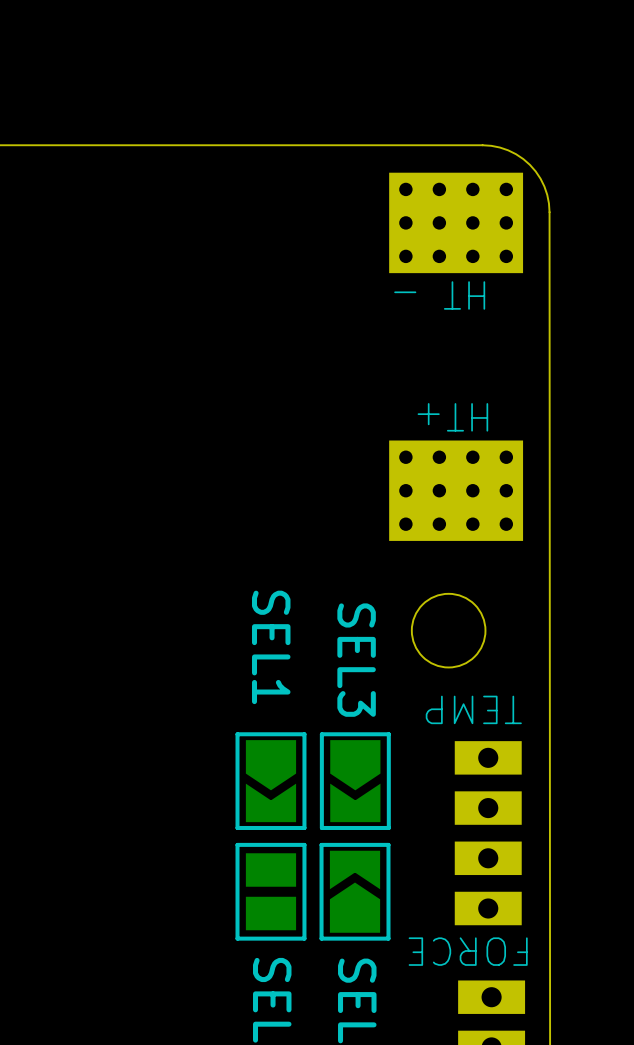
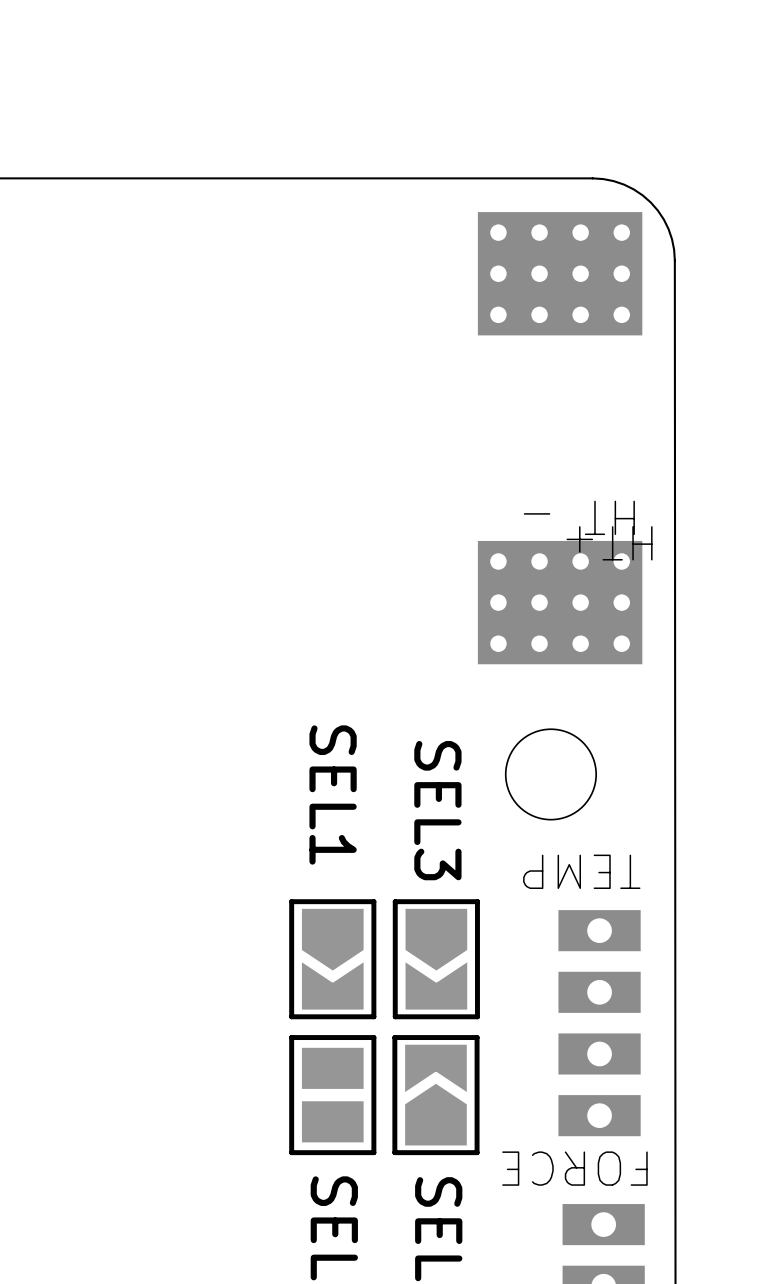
text position: HT - (439, 295) -> HT - (579, 517)
text position: HT+ (452, 417) -> HT+ (609, 543)

